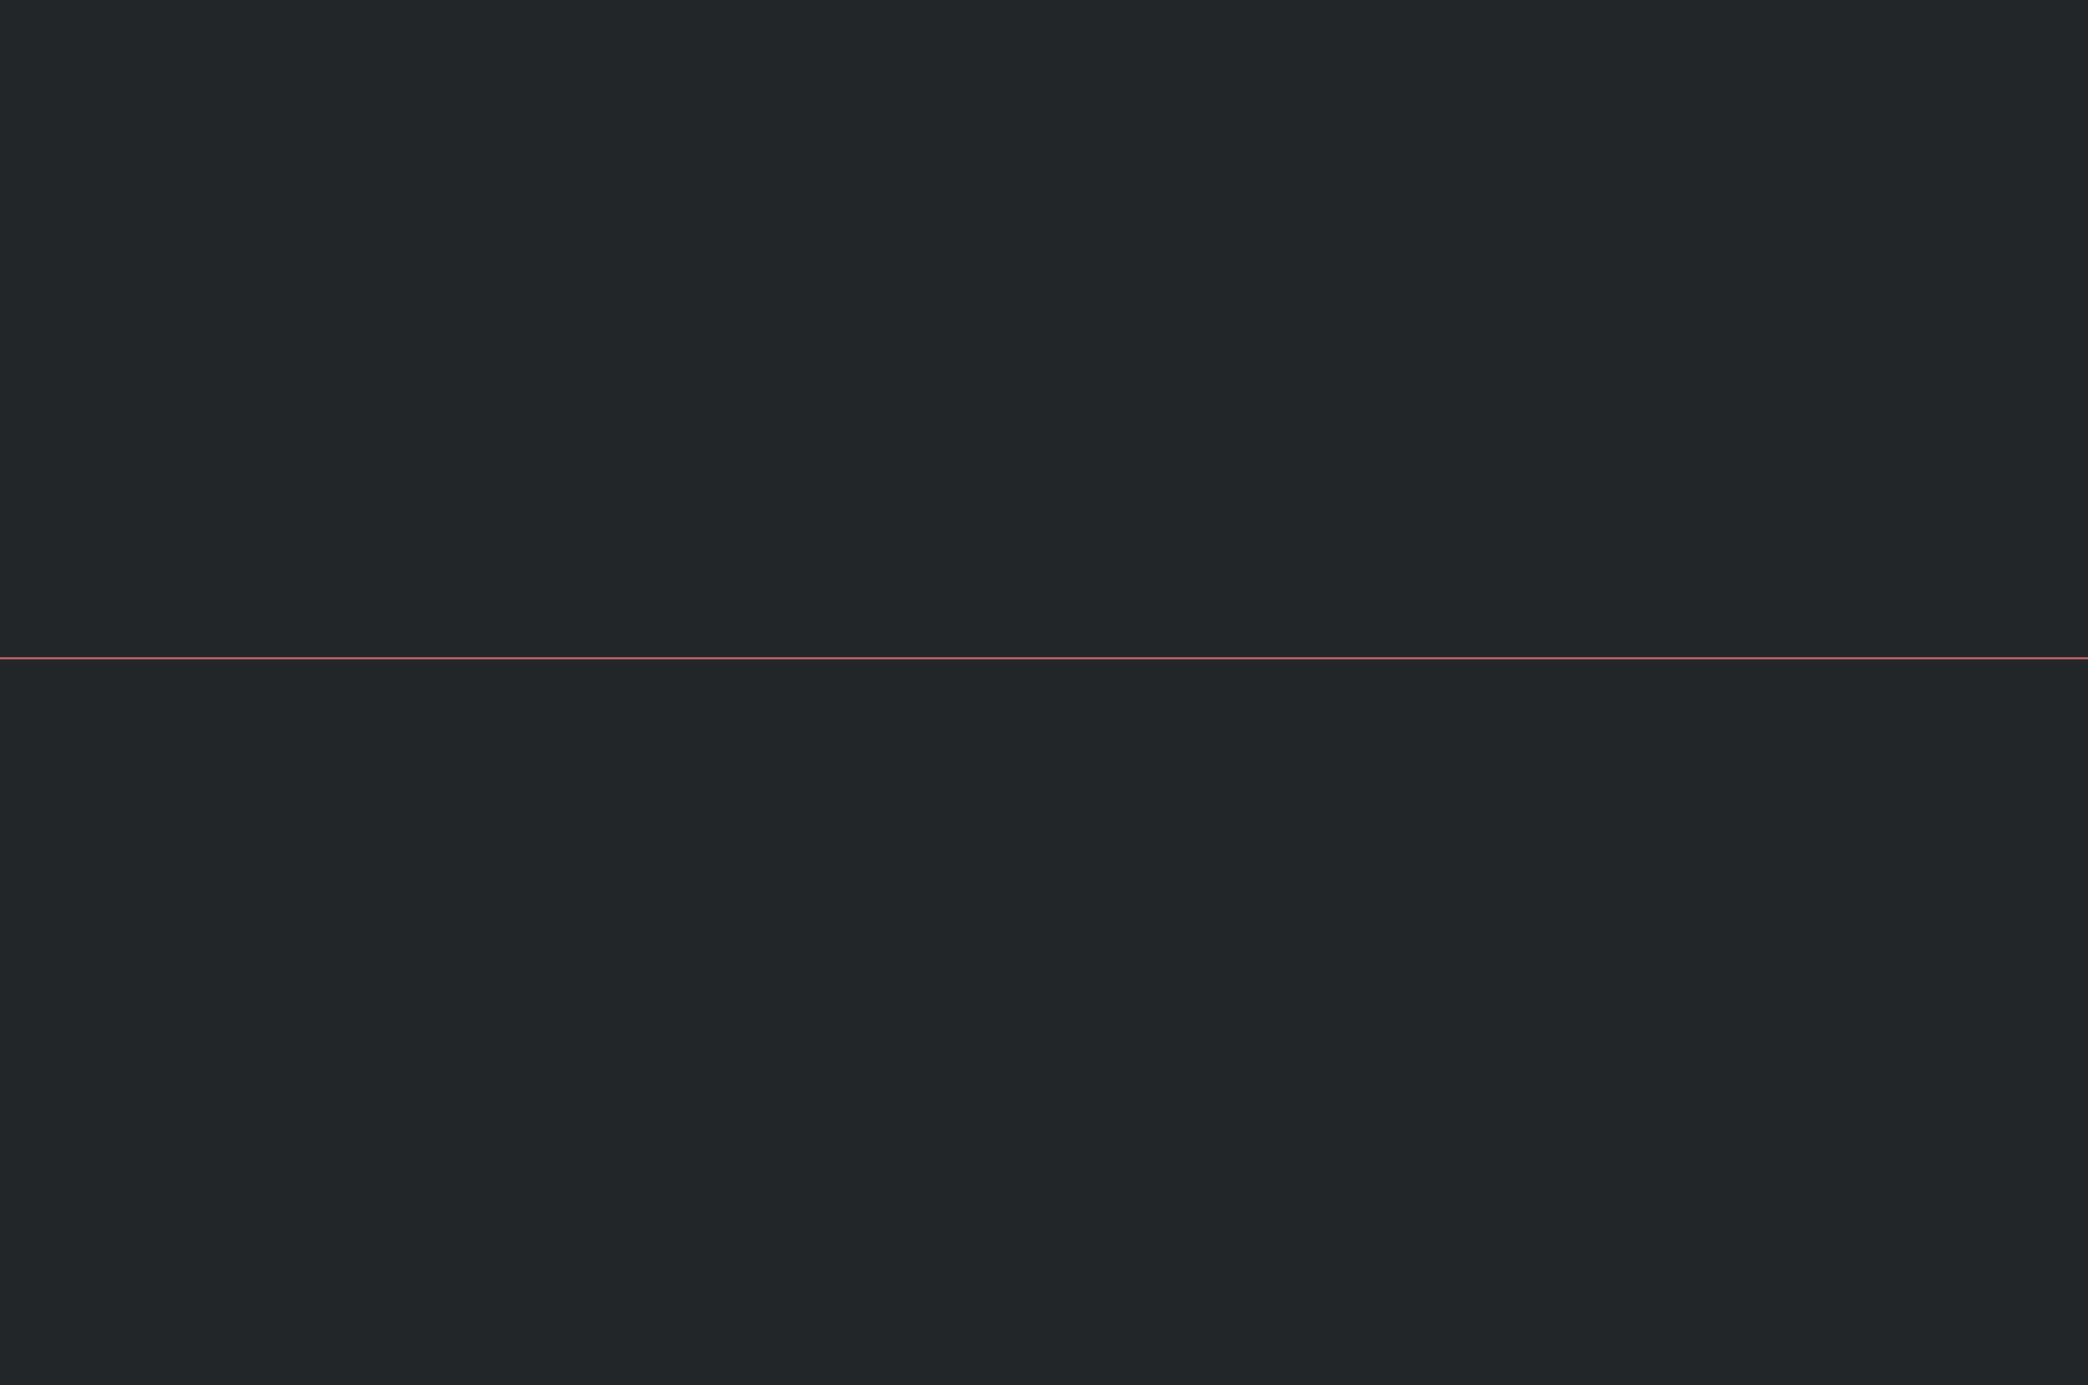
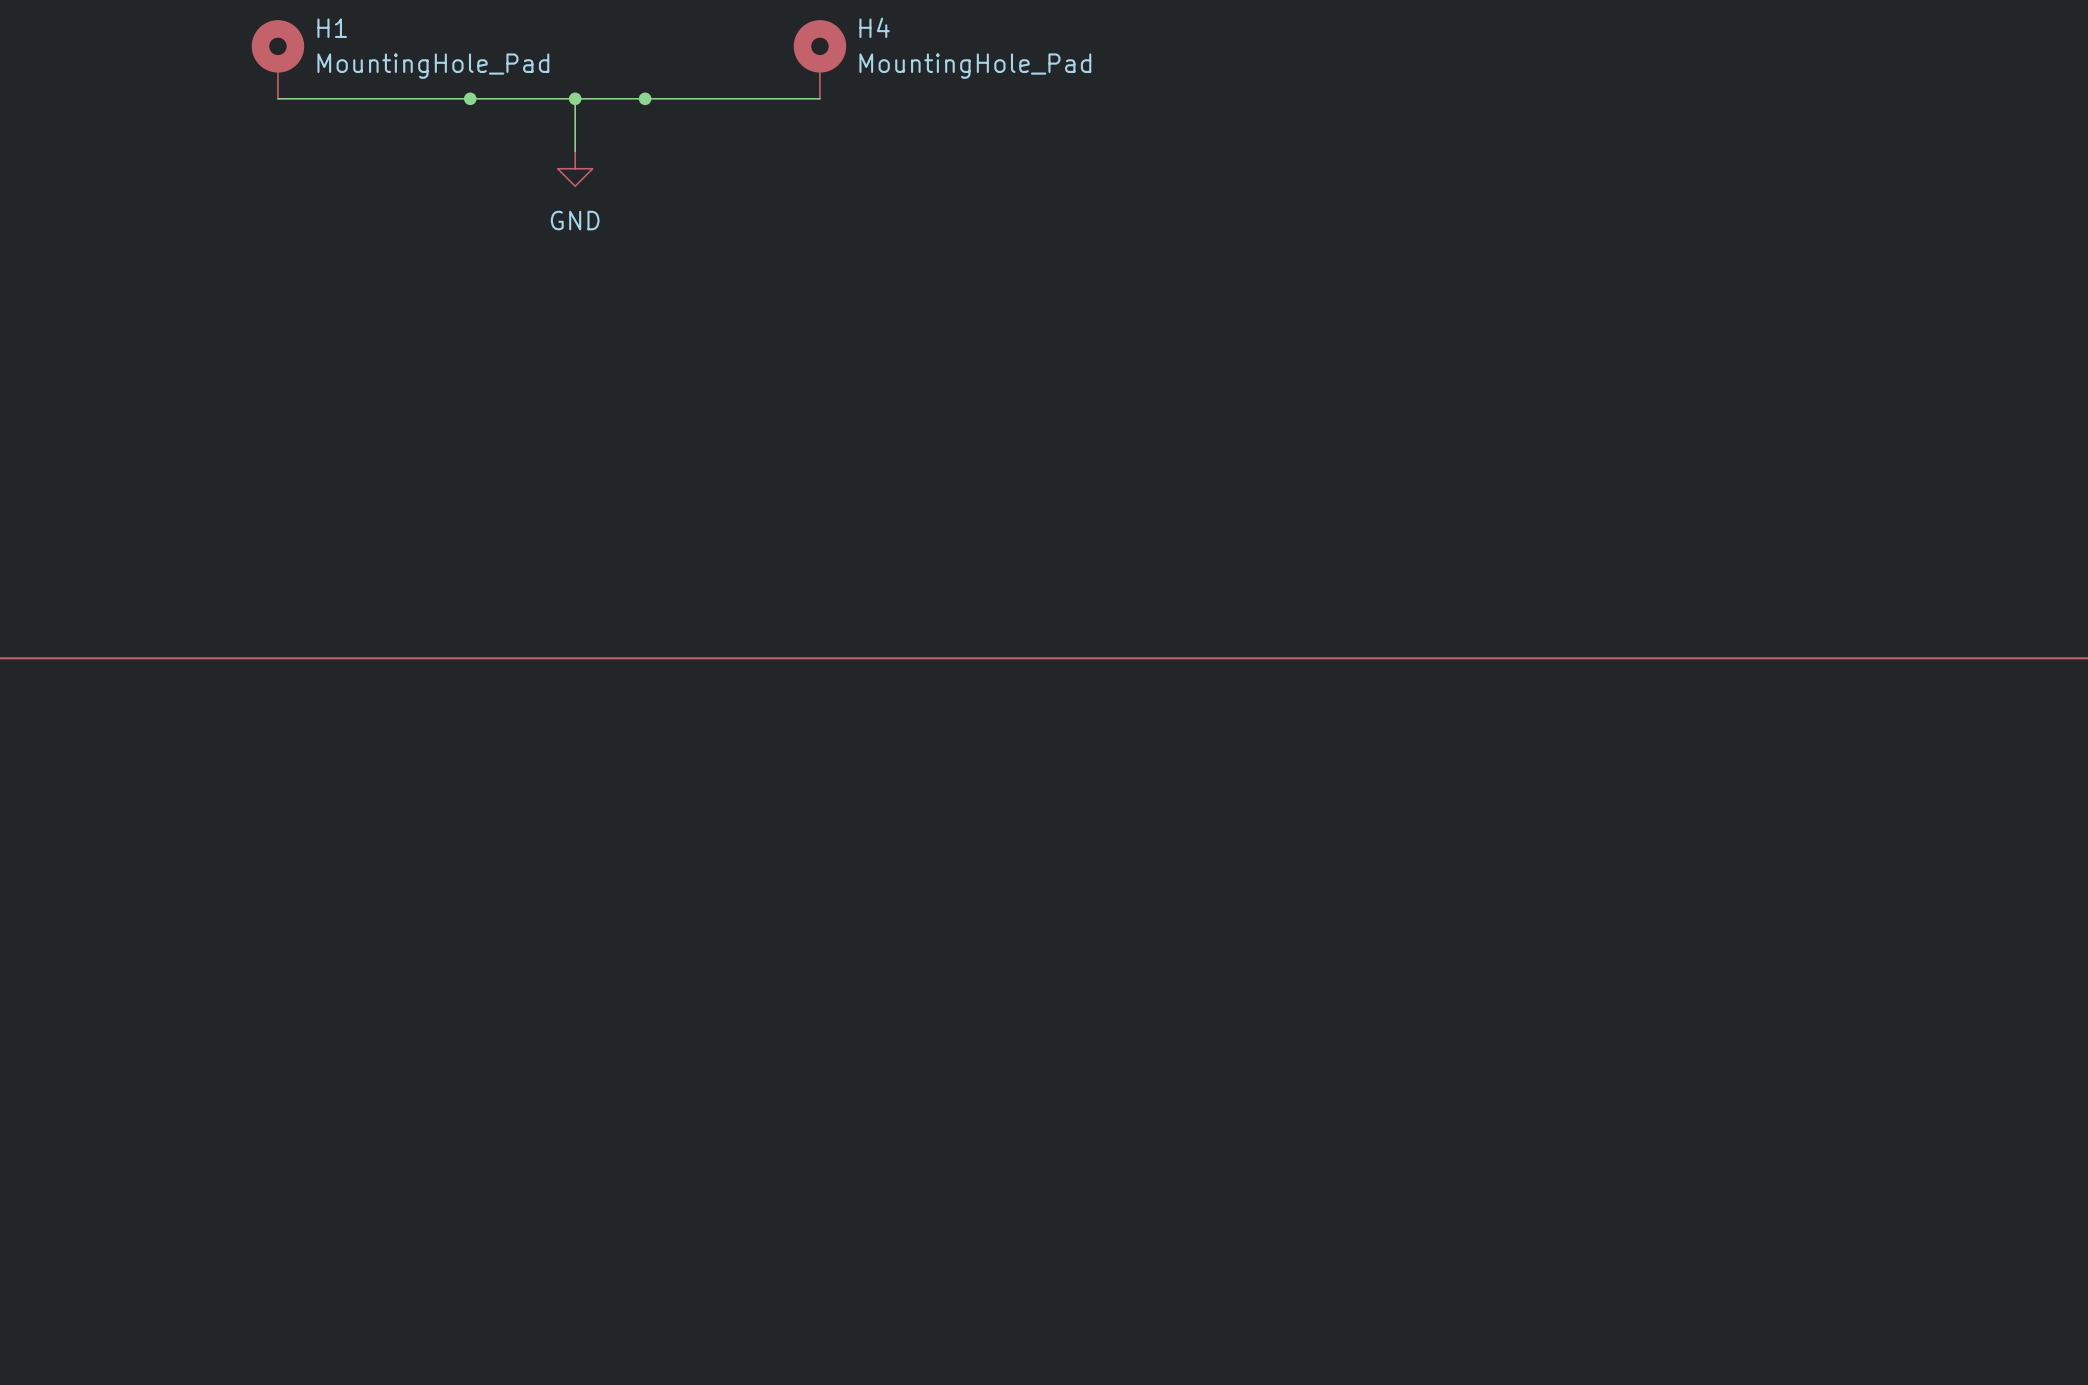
H1: none -> MountingHole_Pad (277, 59)
H4: none -> MountingHole_Pad (819, 59)
wire: none -> (277, 98) (819, 98)
junction: none -> (470, 98)
wire: none -> (575, 98) (575, 151)
junction: none -> (575, 98)
junction: none -> (645, 98)
power symbol: none -> GND (575, 168)

